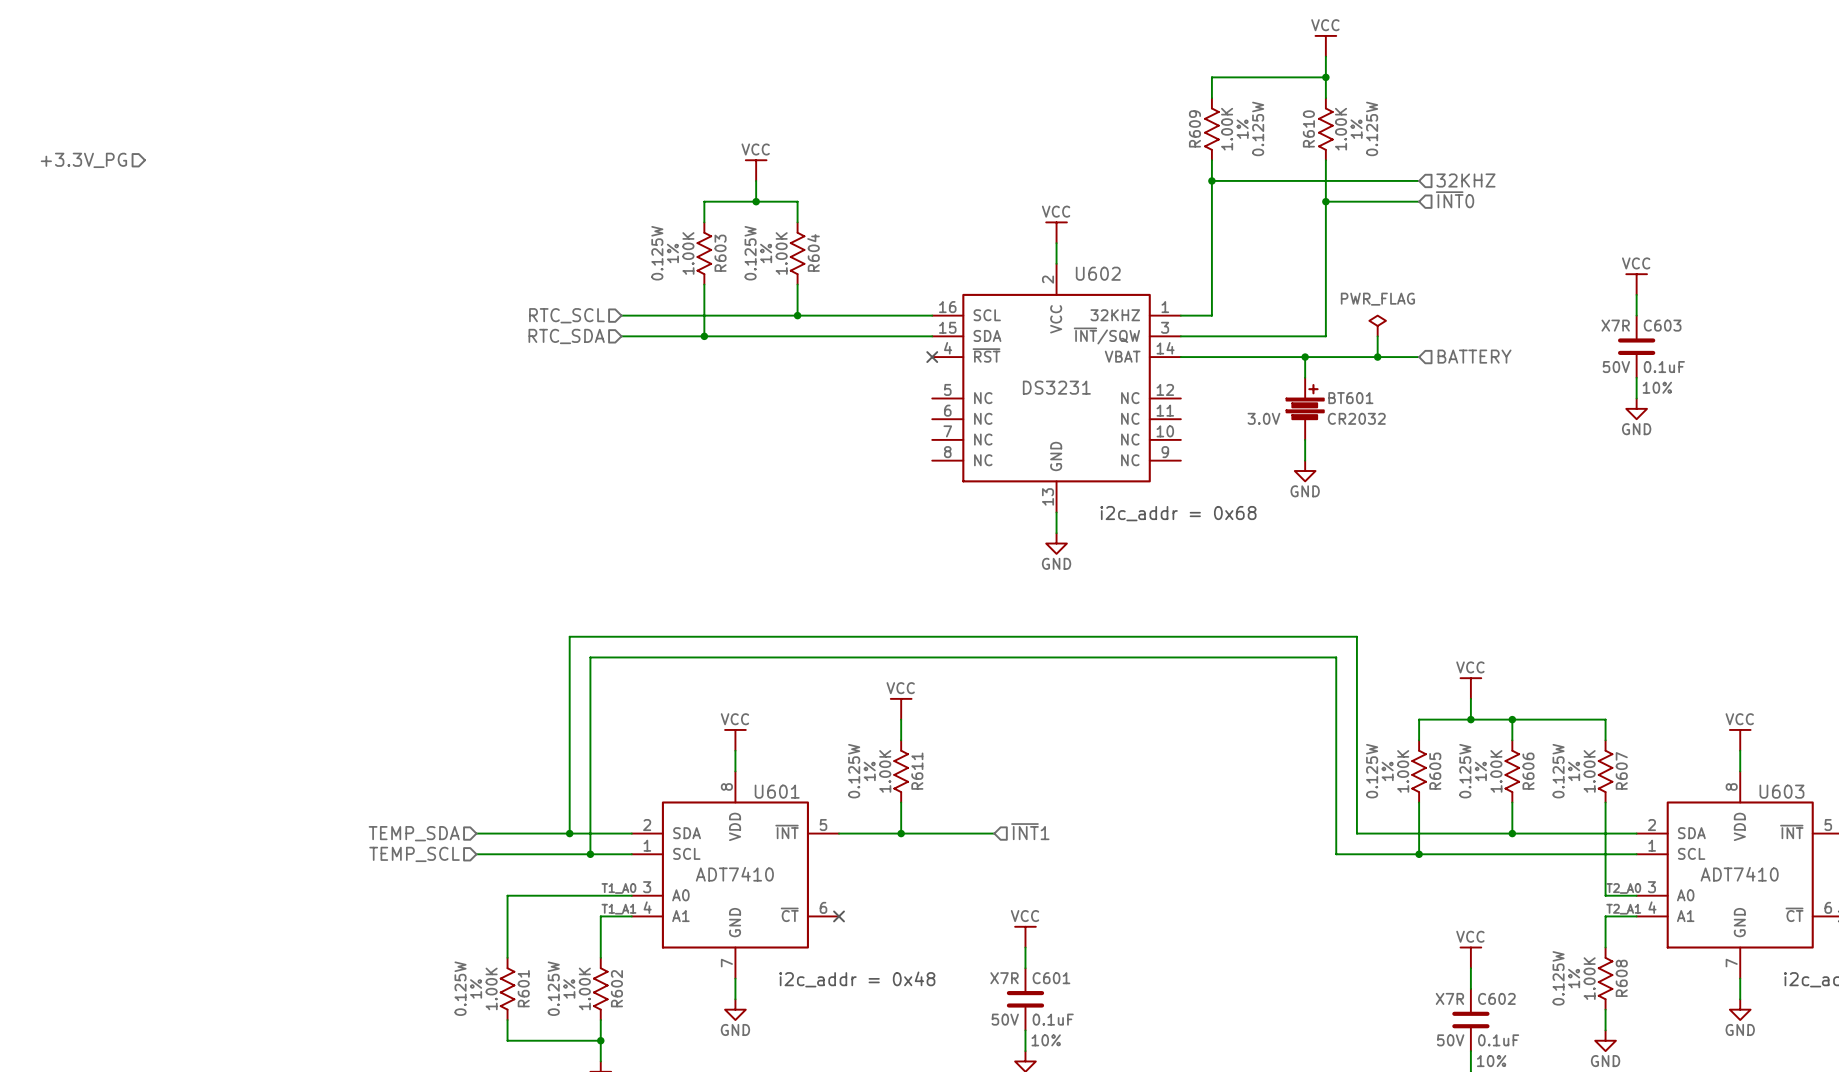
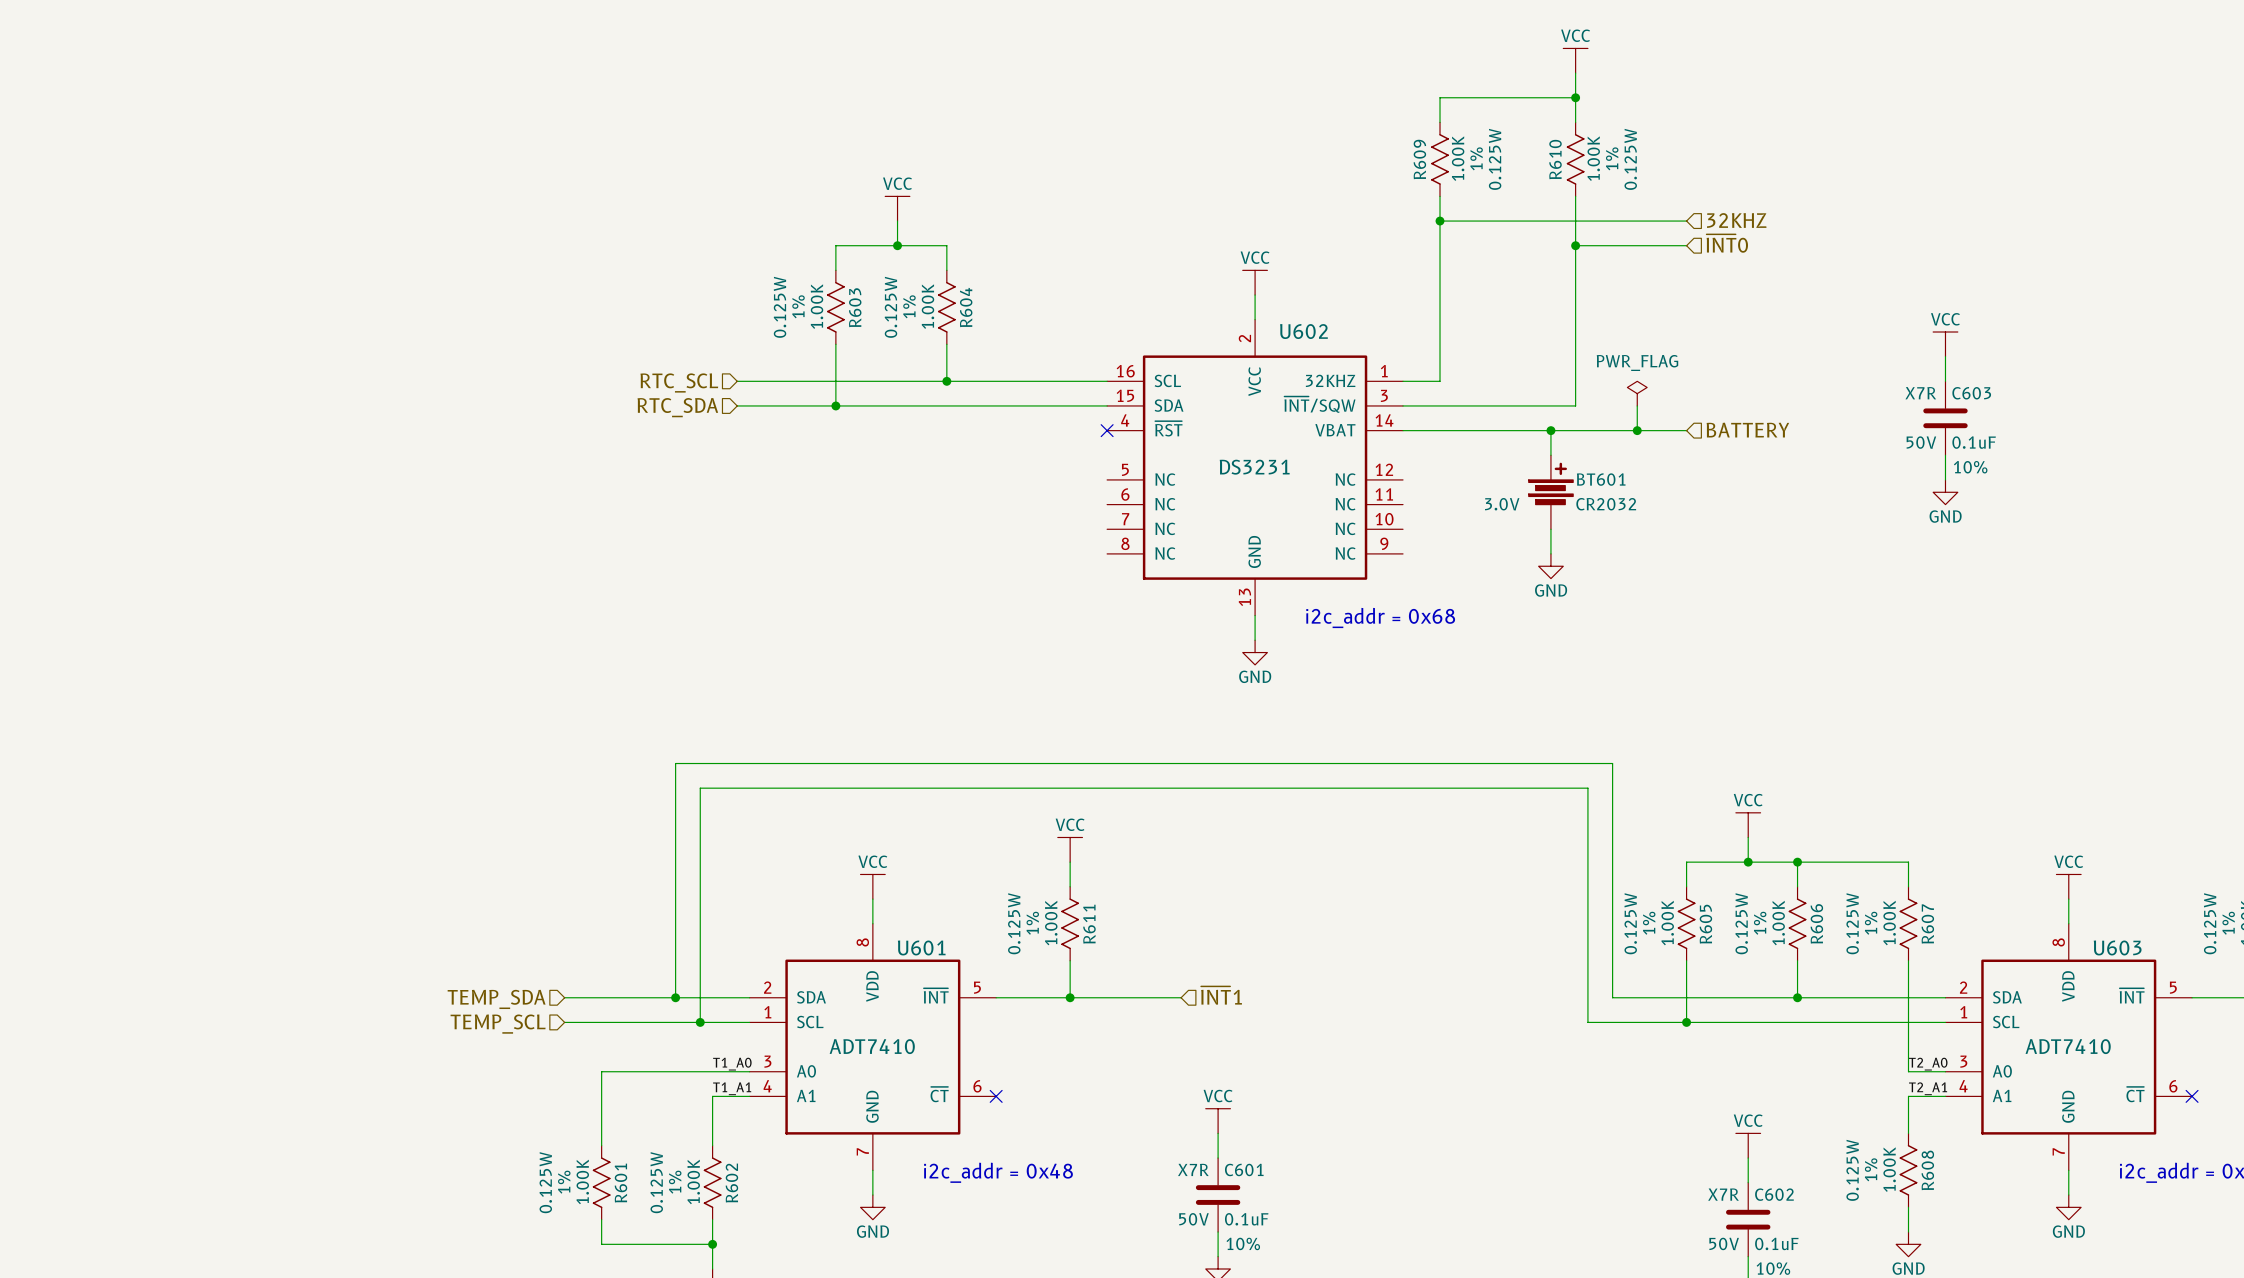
hierarchical label: +3.3V_PG (83, 160) -> none

